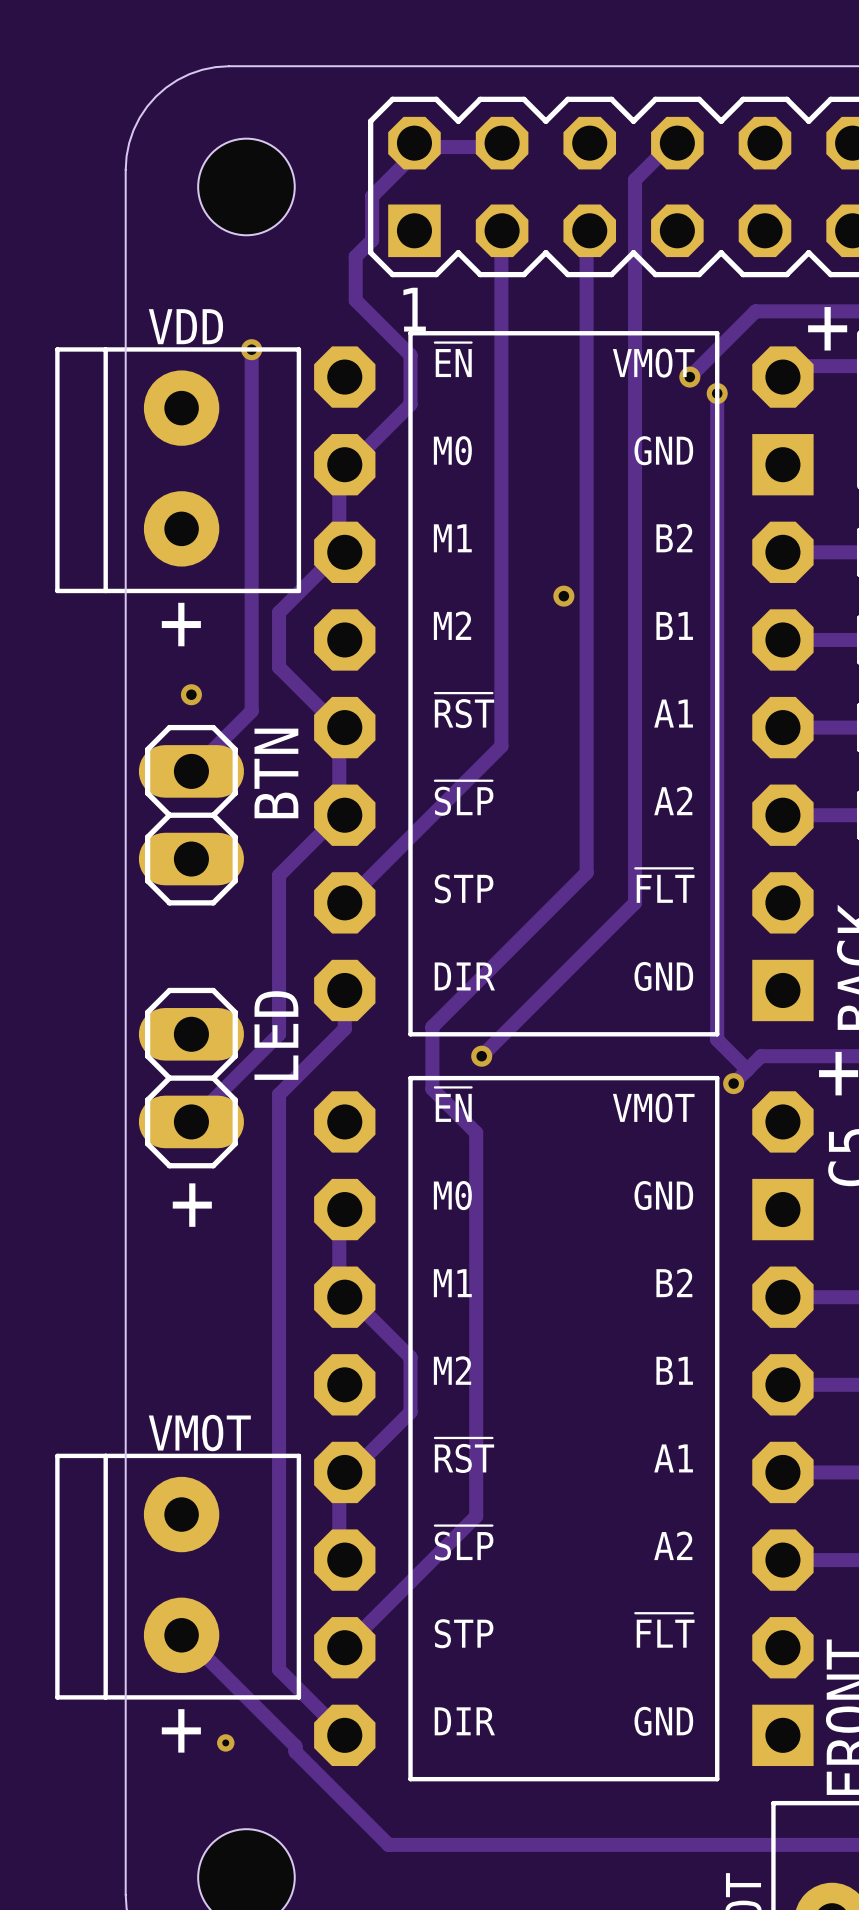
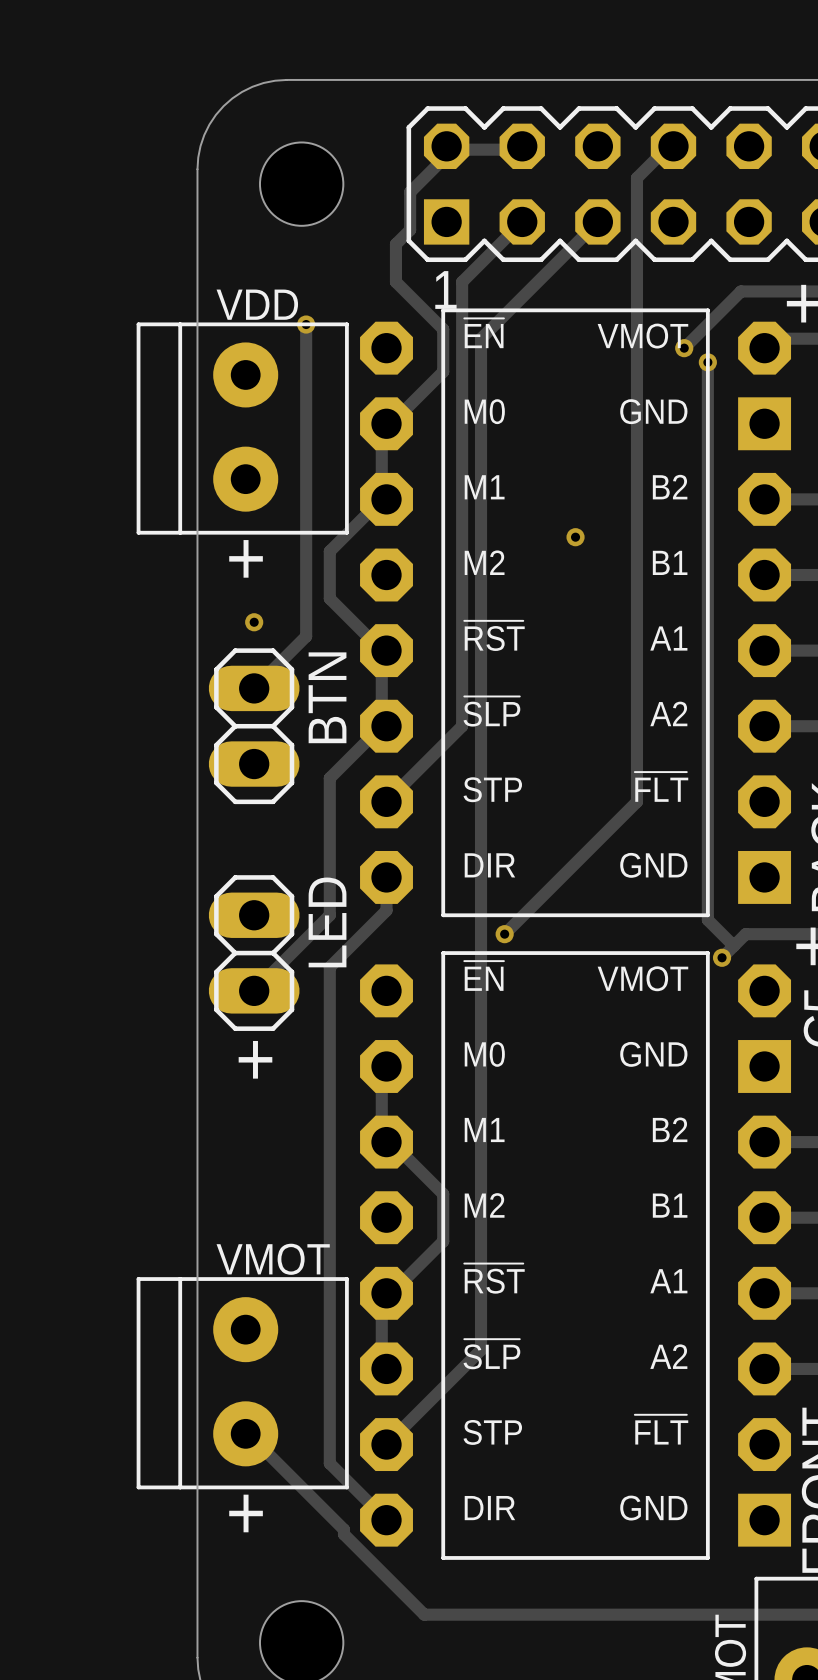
track: (498, 234) (501, 237) (501, 746) (432, 815) -> (518, 225) (462, 282) (462, 726)
track: (585, 234) (586, 872) (432, 1026) (432, 1089) (476, 1132) (476, 1516) (454, 1538) -> (594, 225) (481, 338) (481, 1350)
via: (225, 1742) -> none

